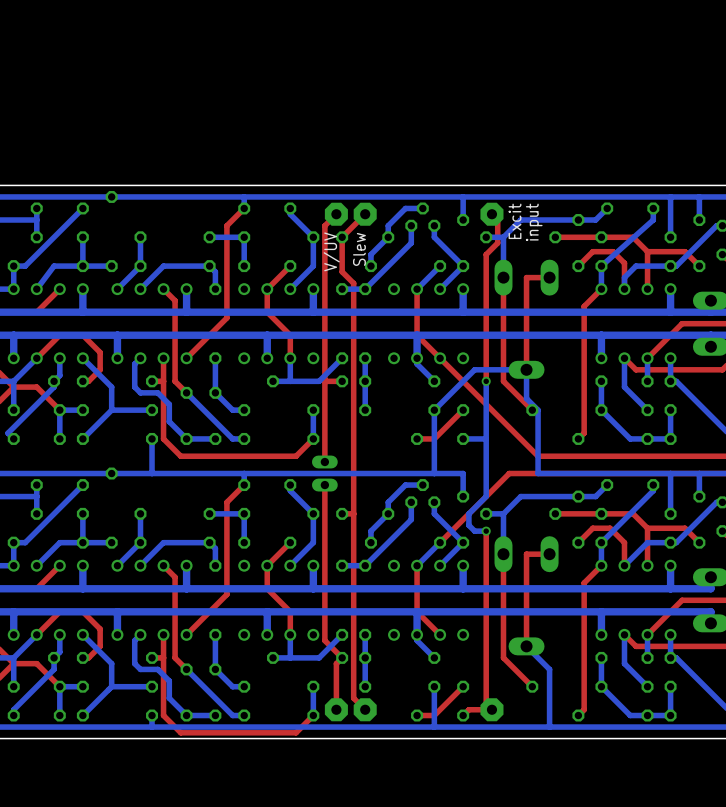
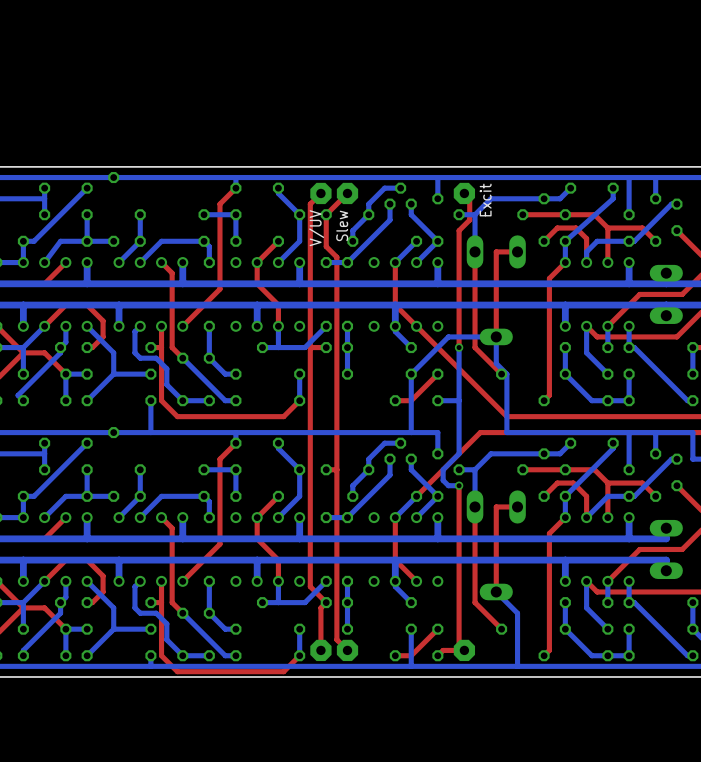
text: input (534, 222) -> none
top track: none -> (310, 421) (310, 443)
part: (324, 473) -> none

